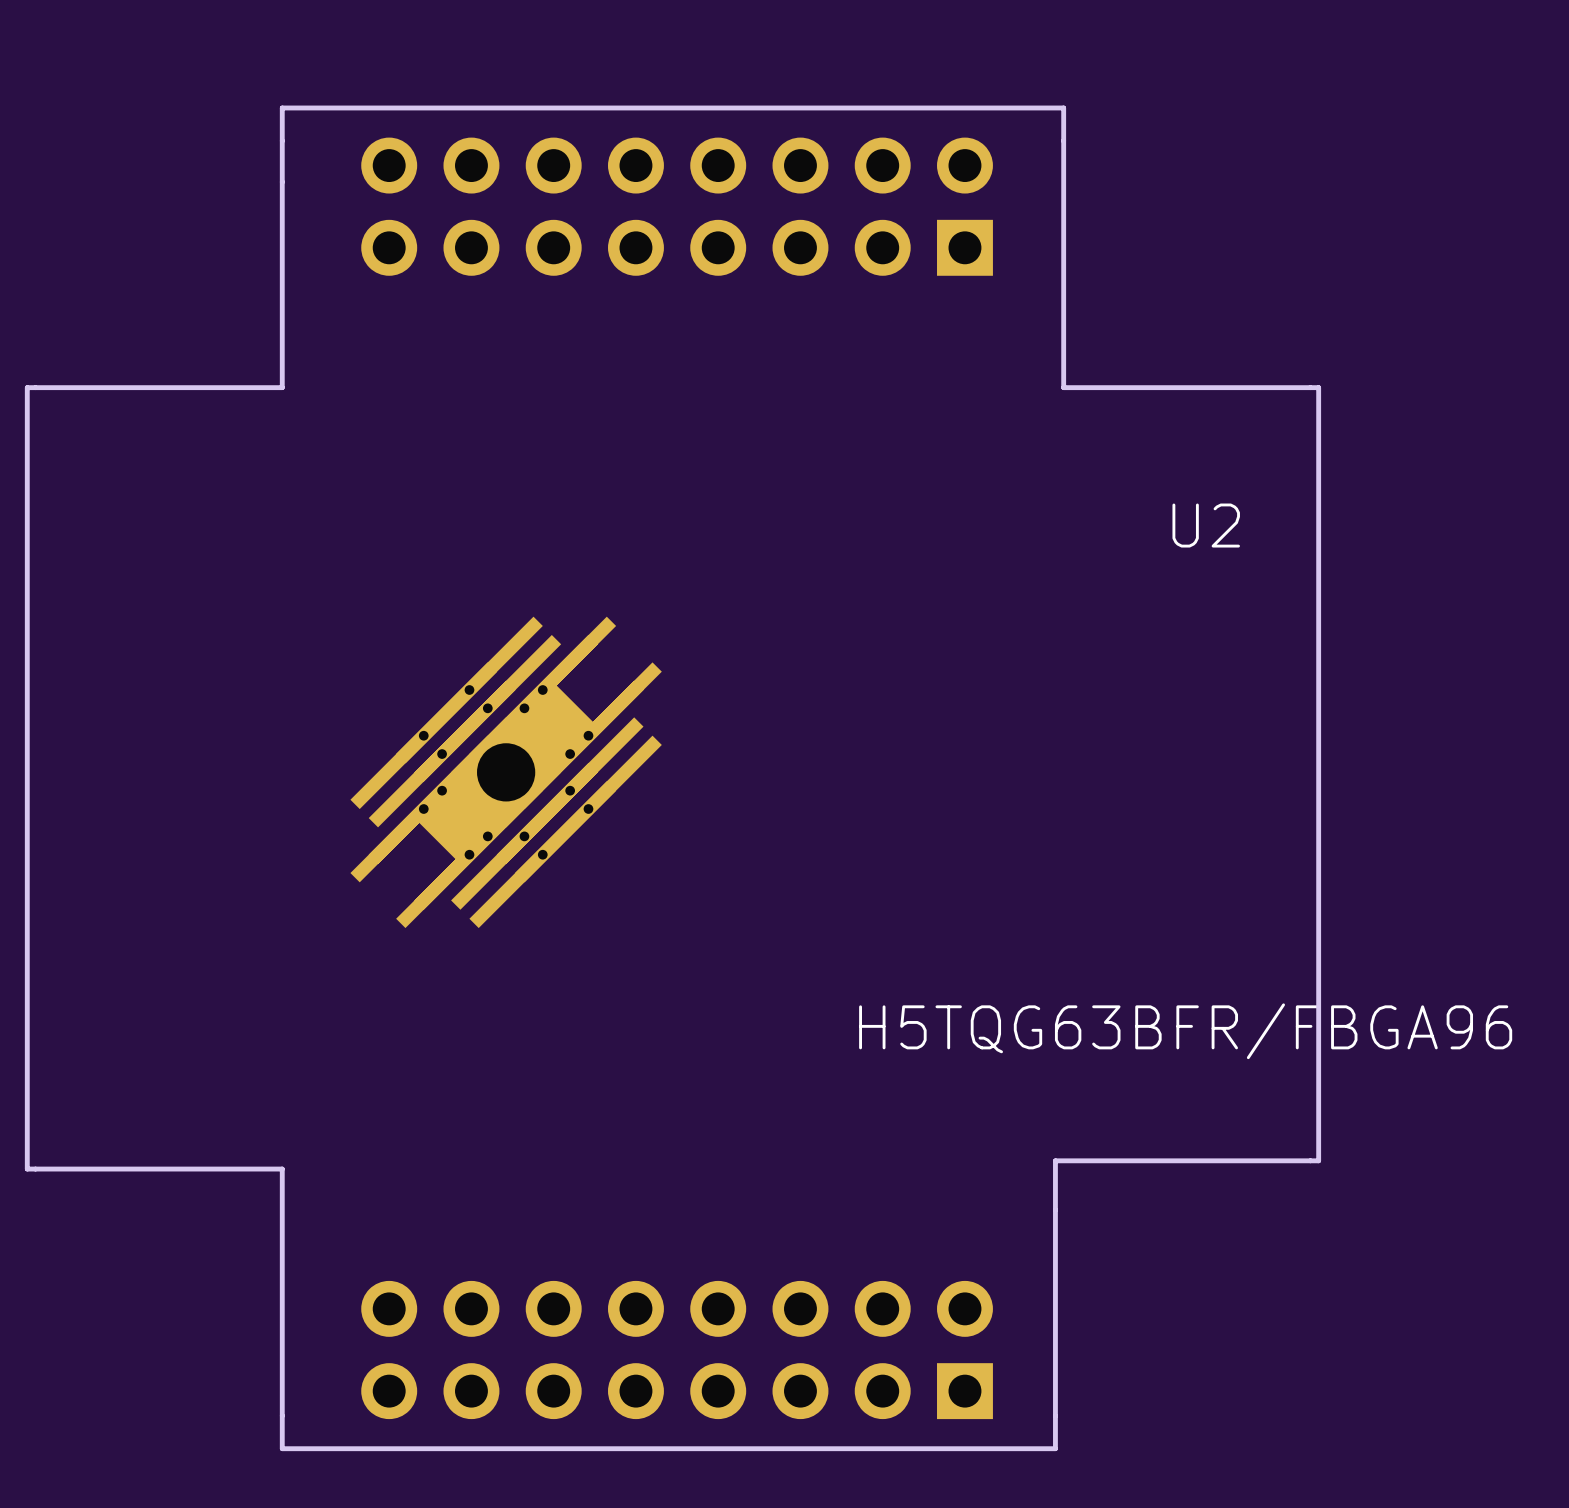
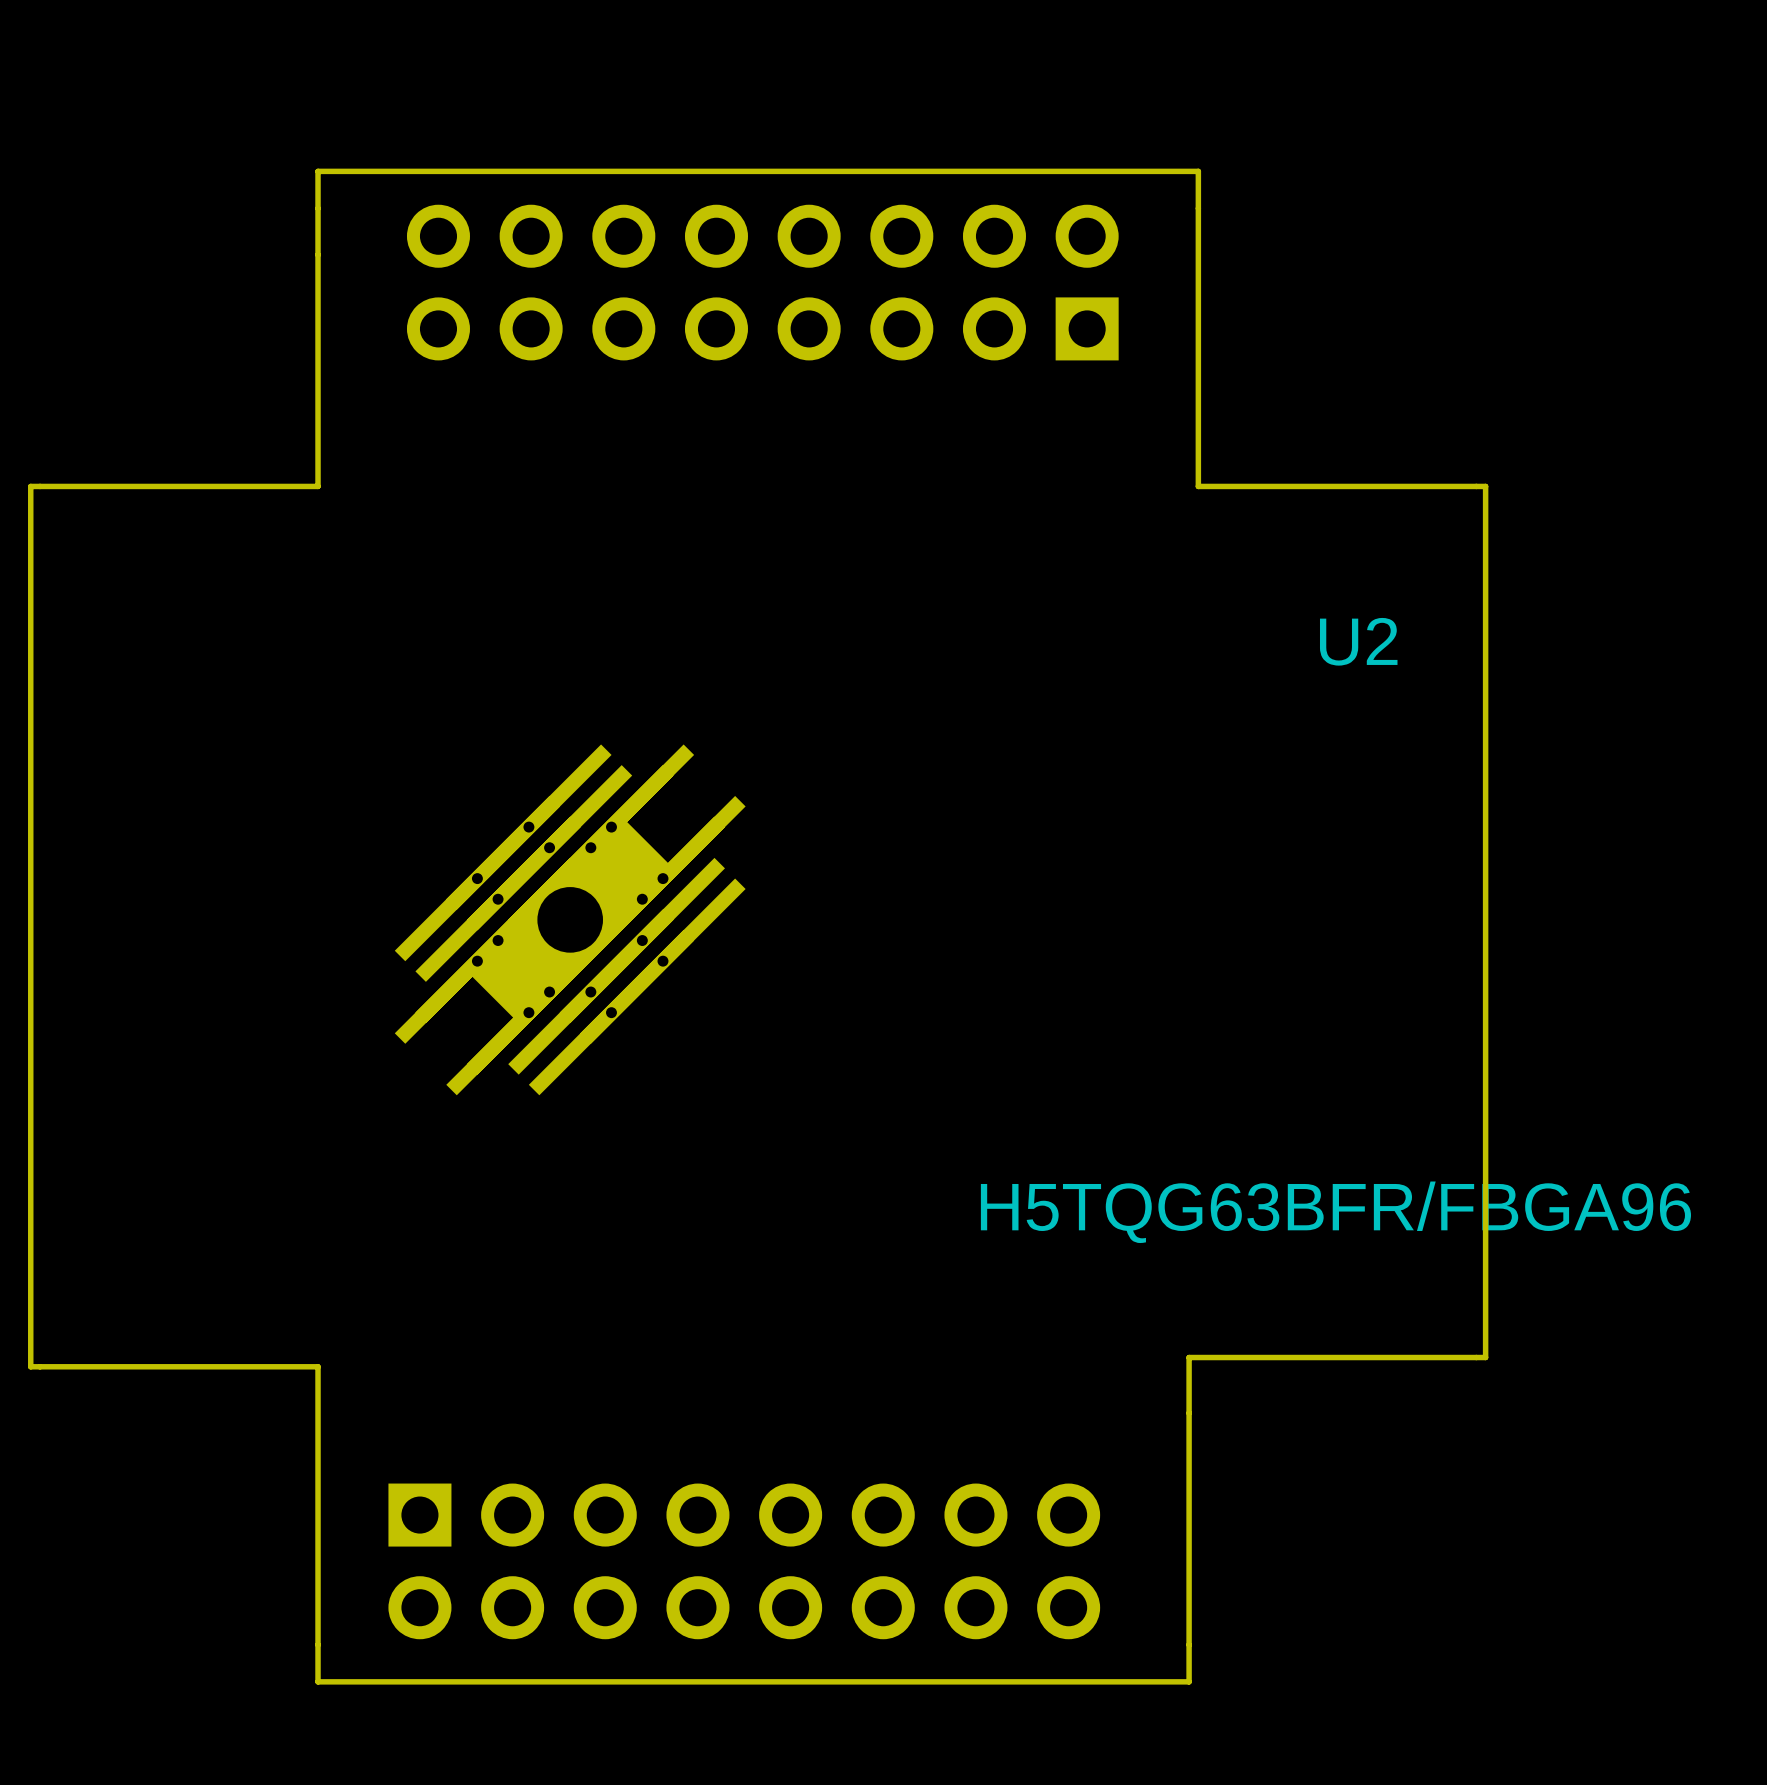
part rotation: 0° (677, 1350) -> 180° (744, 1561)

